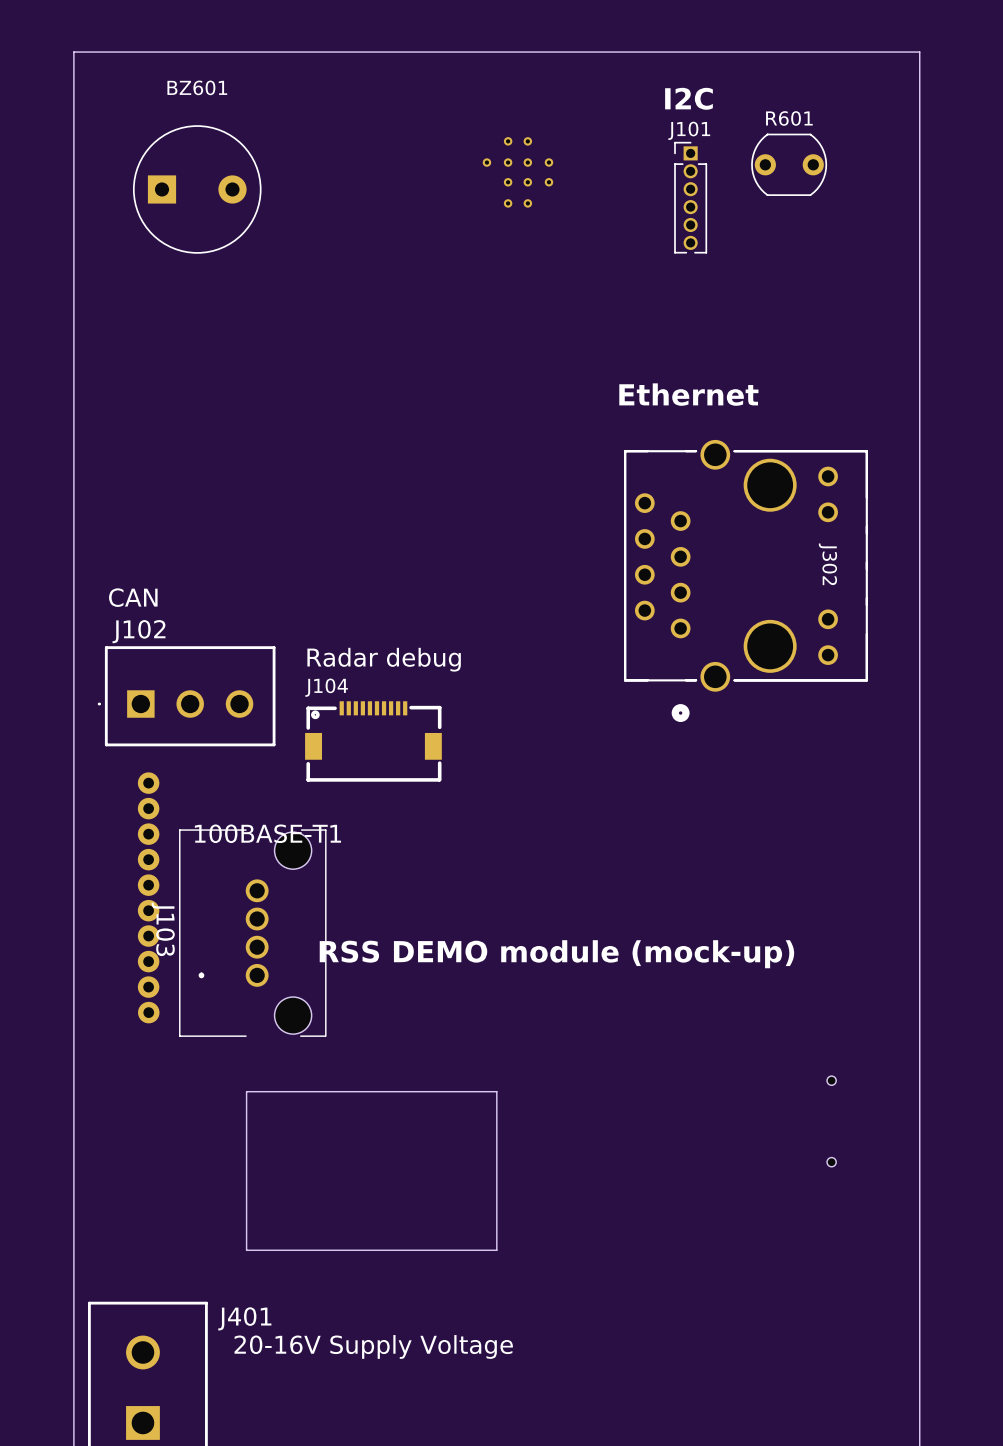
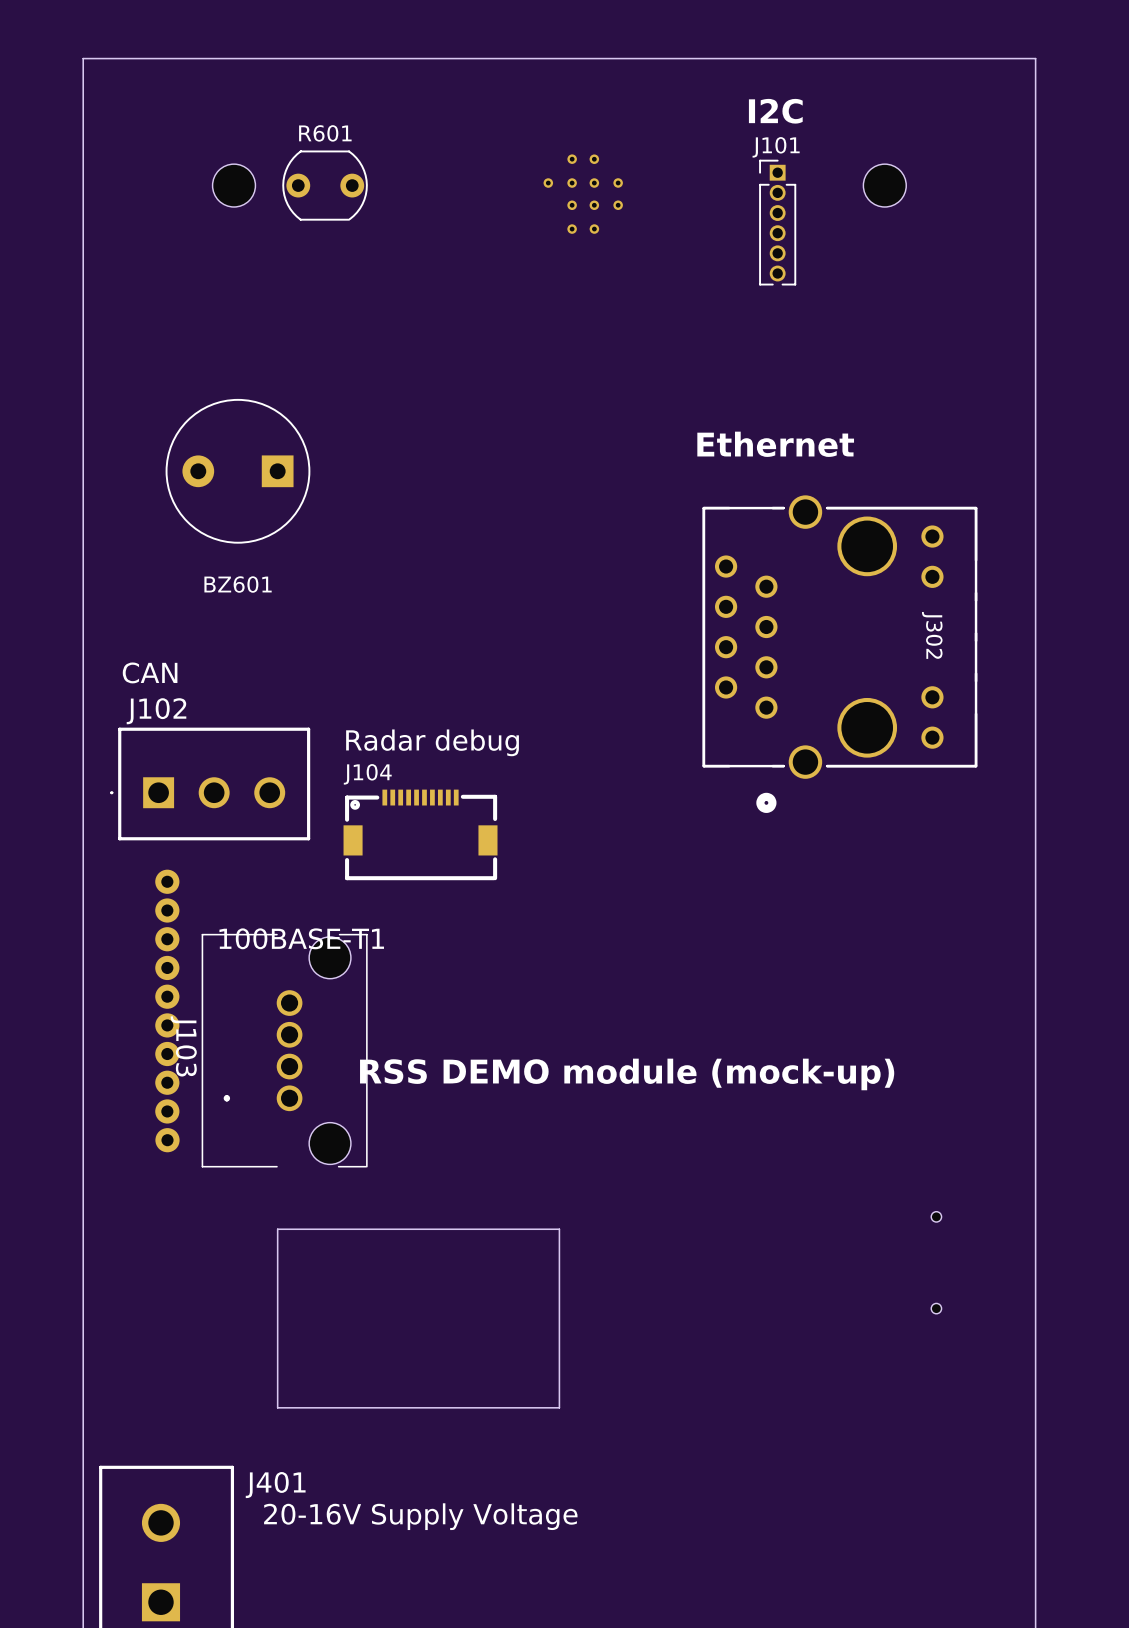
part: none -> (234, 185)
part: none -> (884, 185)
R601 position: (789, 164) -> (325, 185)
BZ601 rotation: 0° (197, 189) -> 180° (237, 471)
BZ601 position: (197, 189) -> (237, 471)

